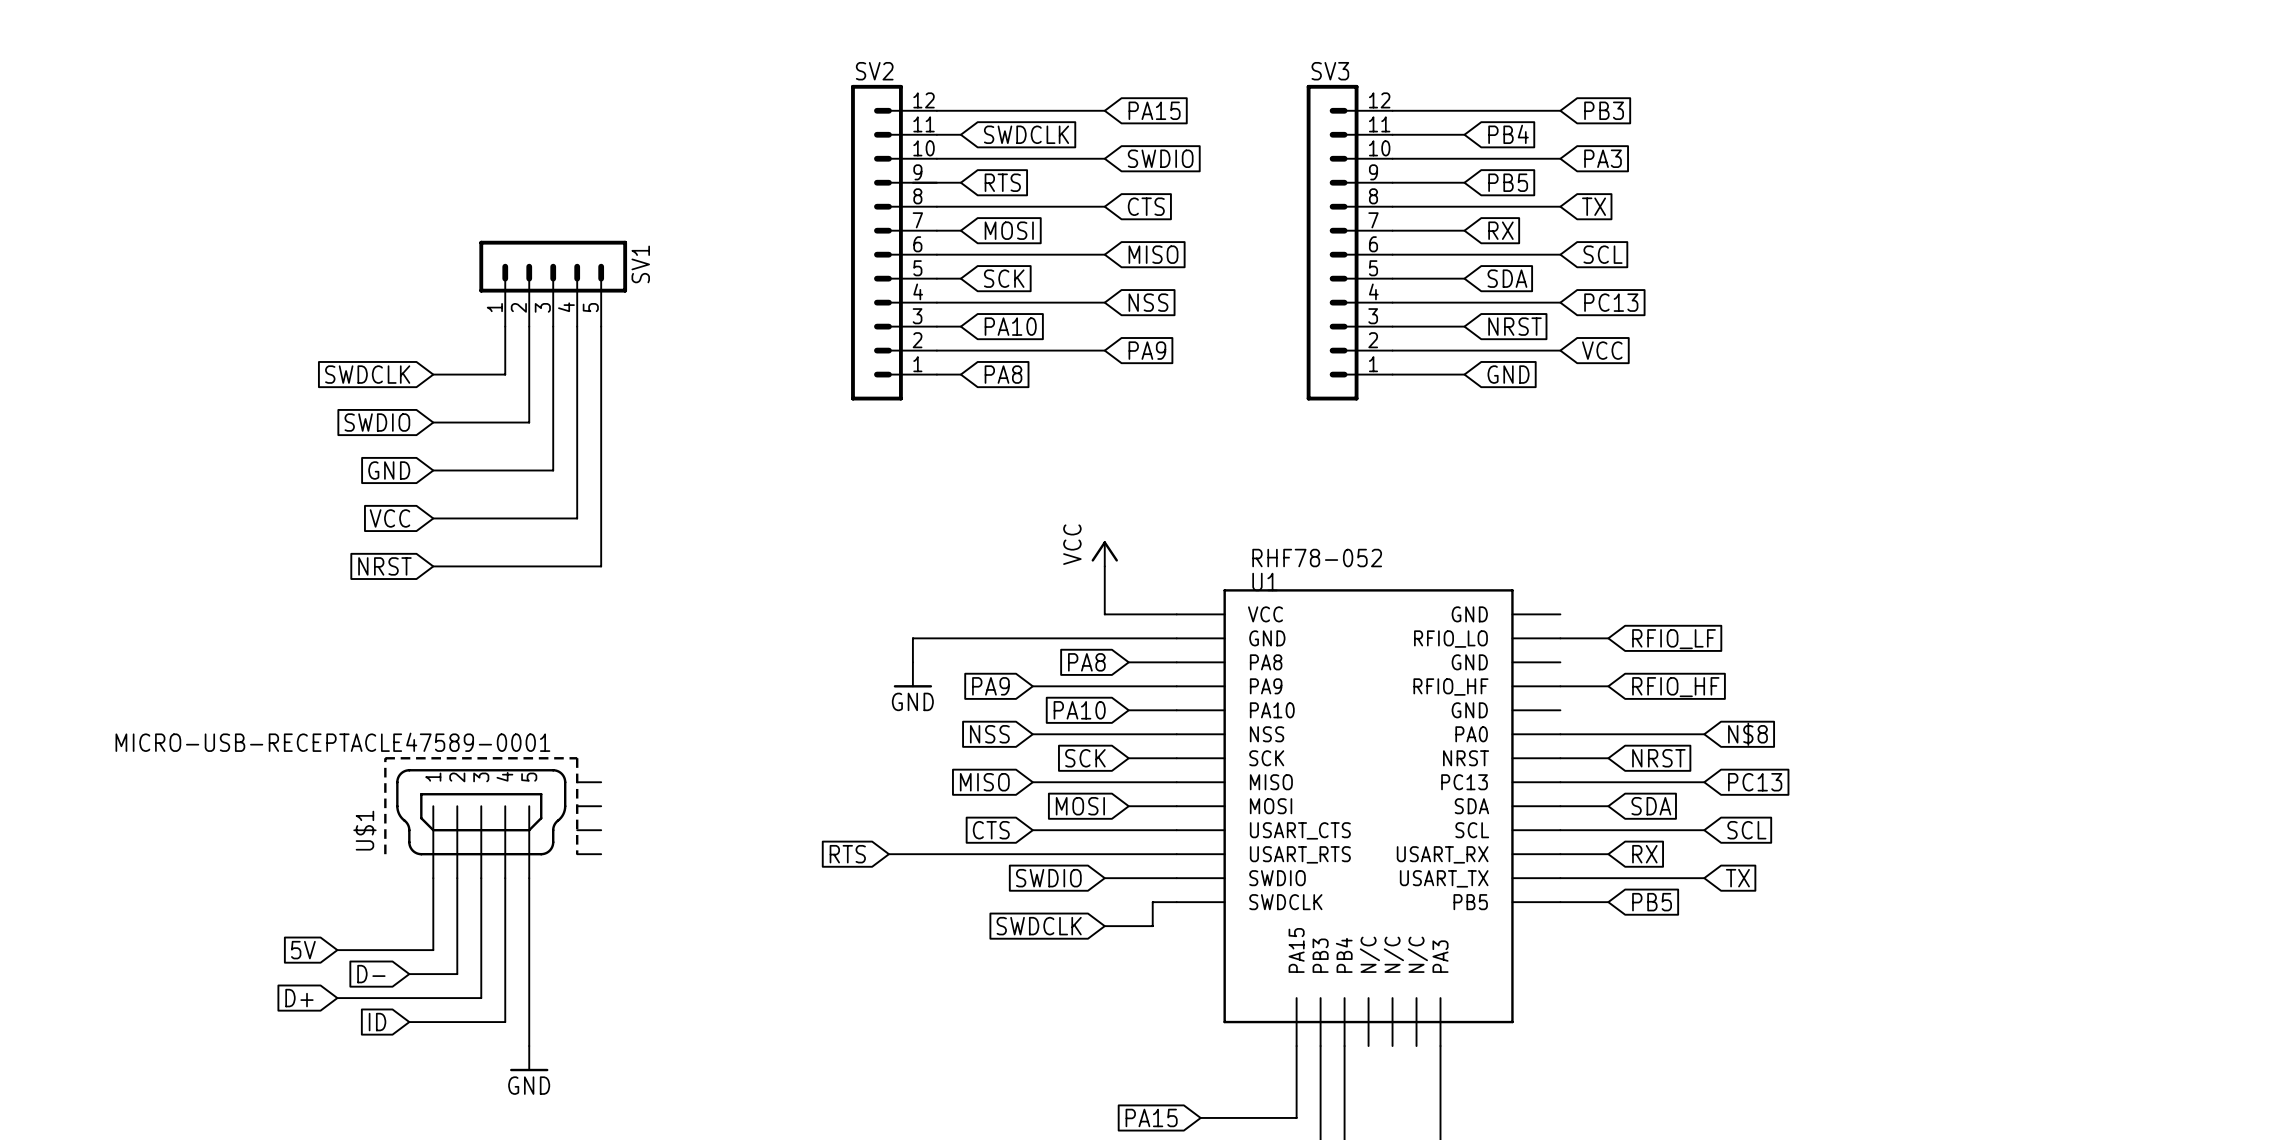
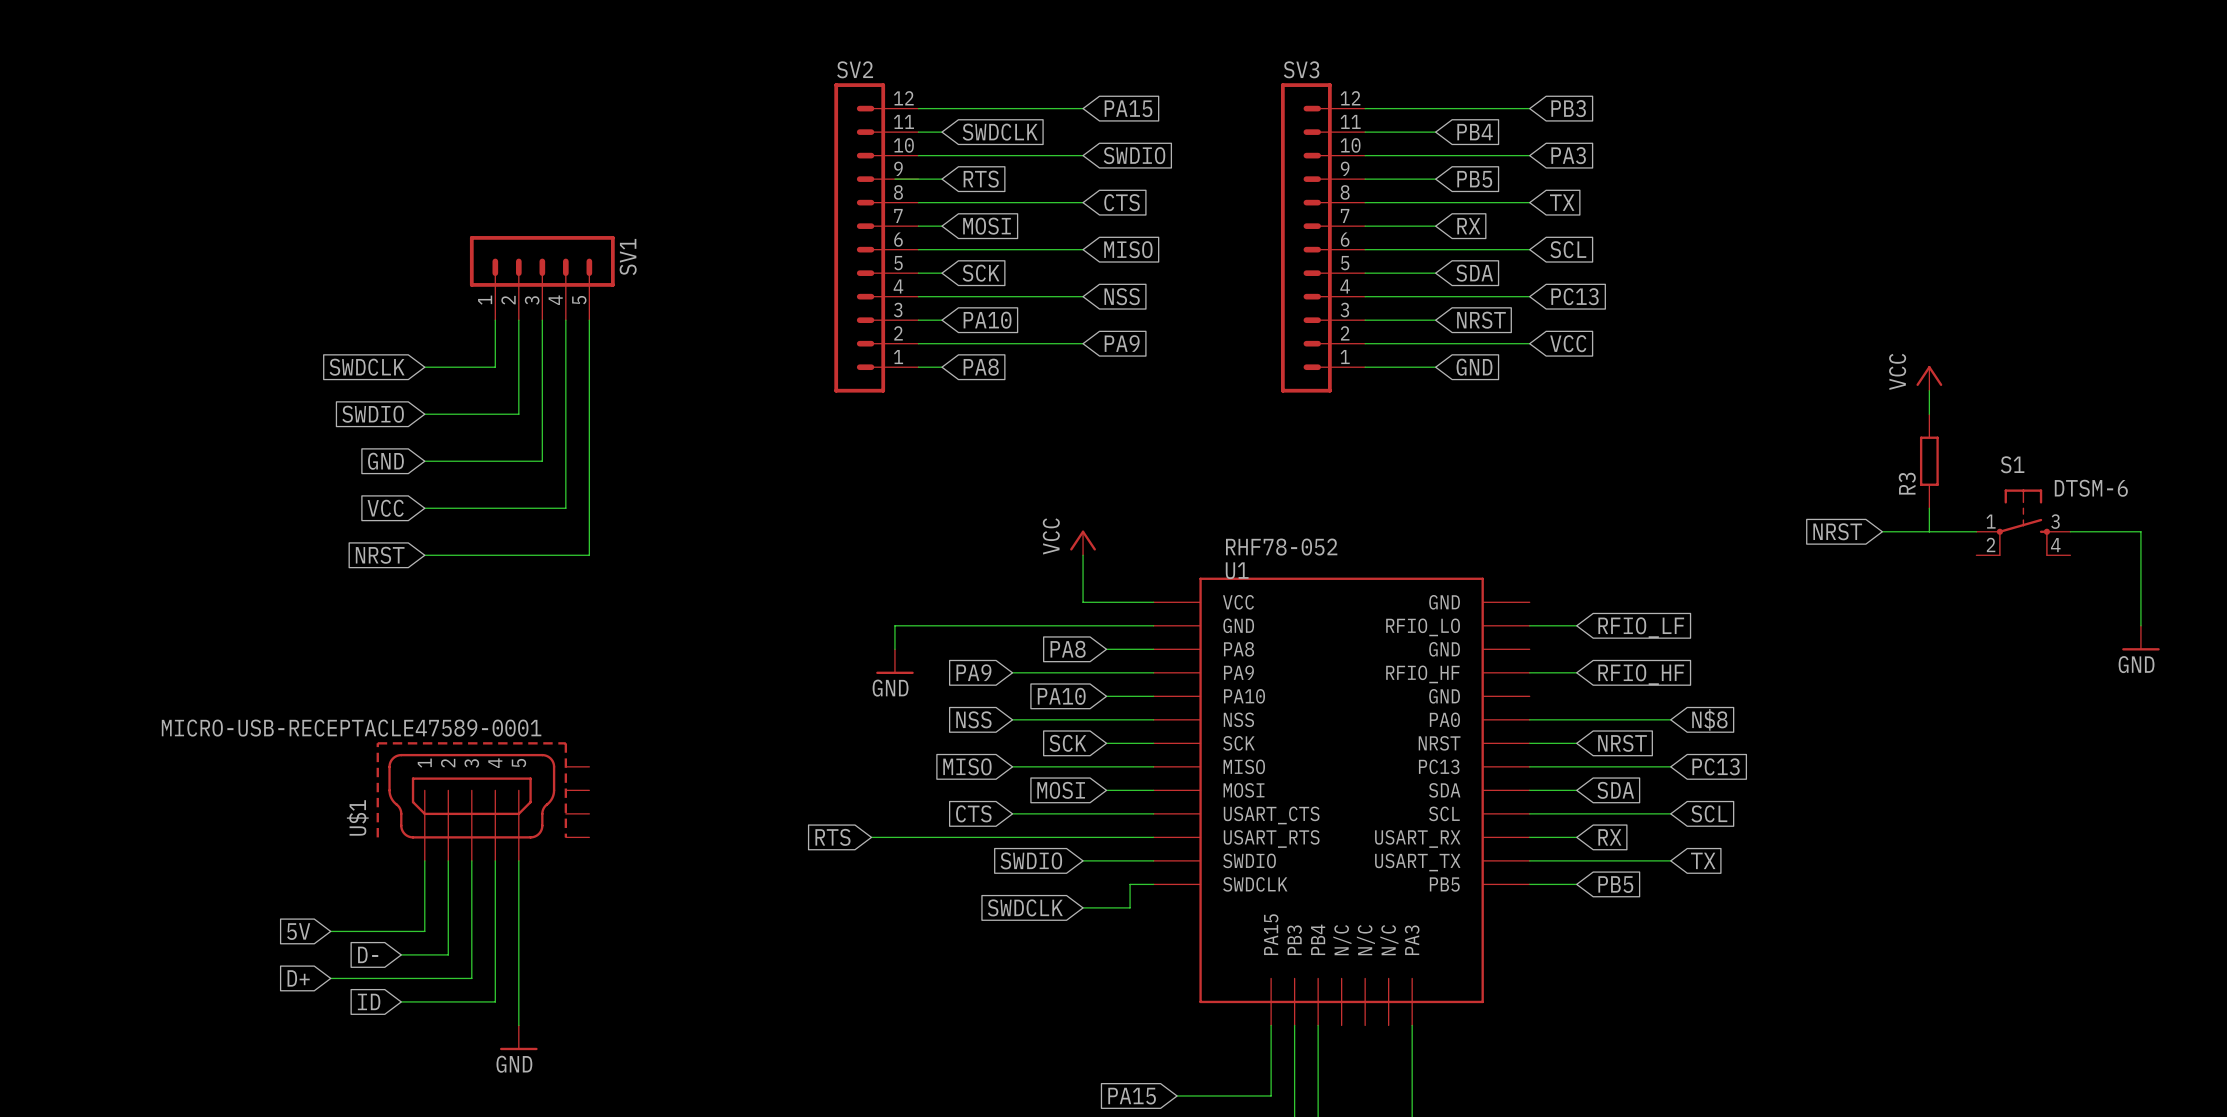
power symbol: none -> VCC (1929, 378)
wire: none -> (1929, 390) (1929, 414)
R3: none -> (1929, 461)
wire: none -> (1929, 508) (1929, 531)
S1: none -> DTSM-6 (2023, 522)
global label: none -> NRST (1837, 531)
wire: none -> (1882, 531) (1976, 531)
wire: none -> (2070, 531) (2140, 531) (2140, 625)
power symbol: none -> GND (2140, 638)

